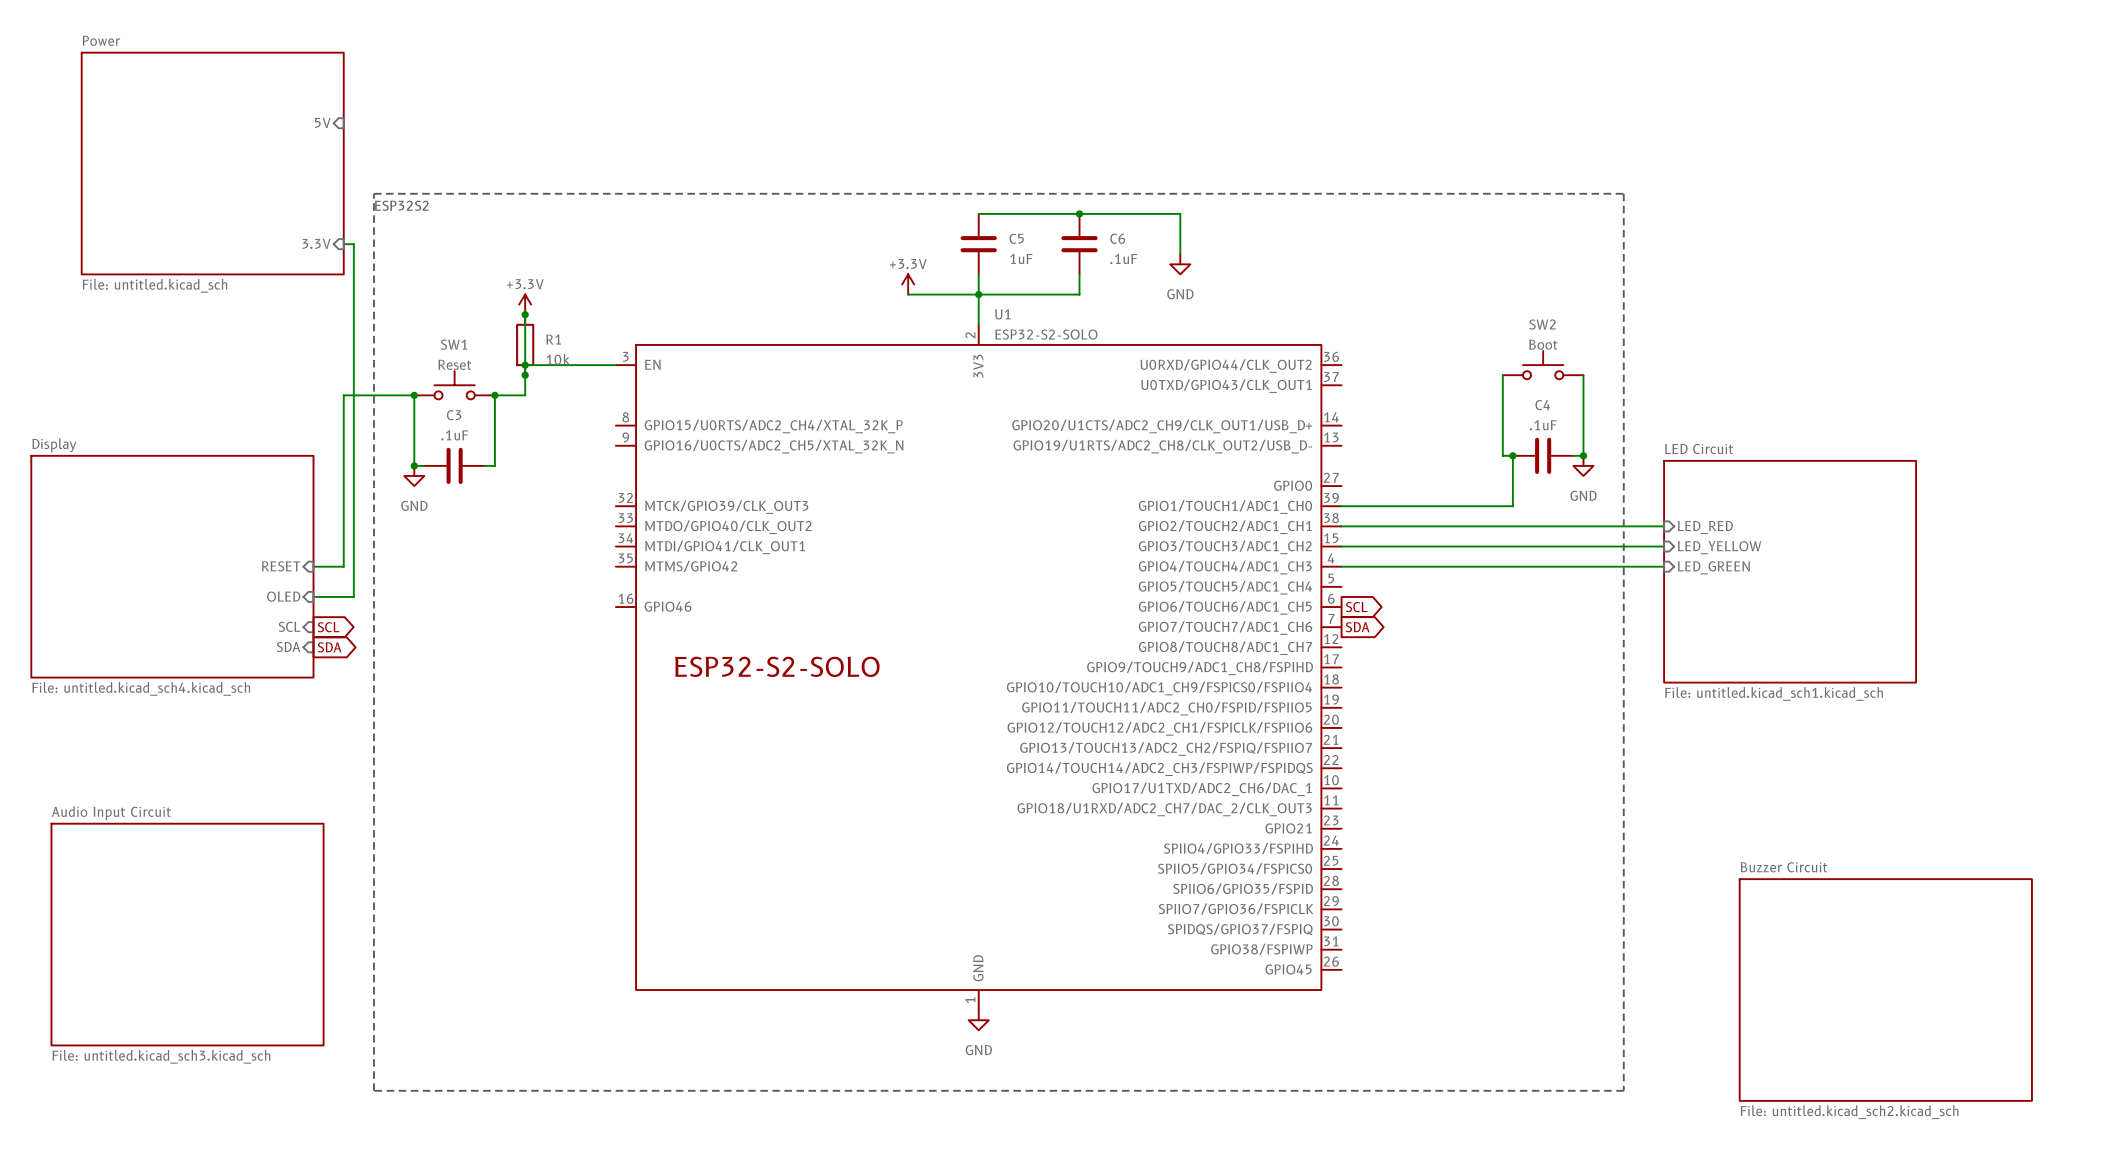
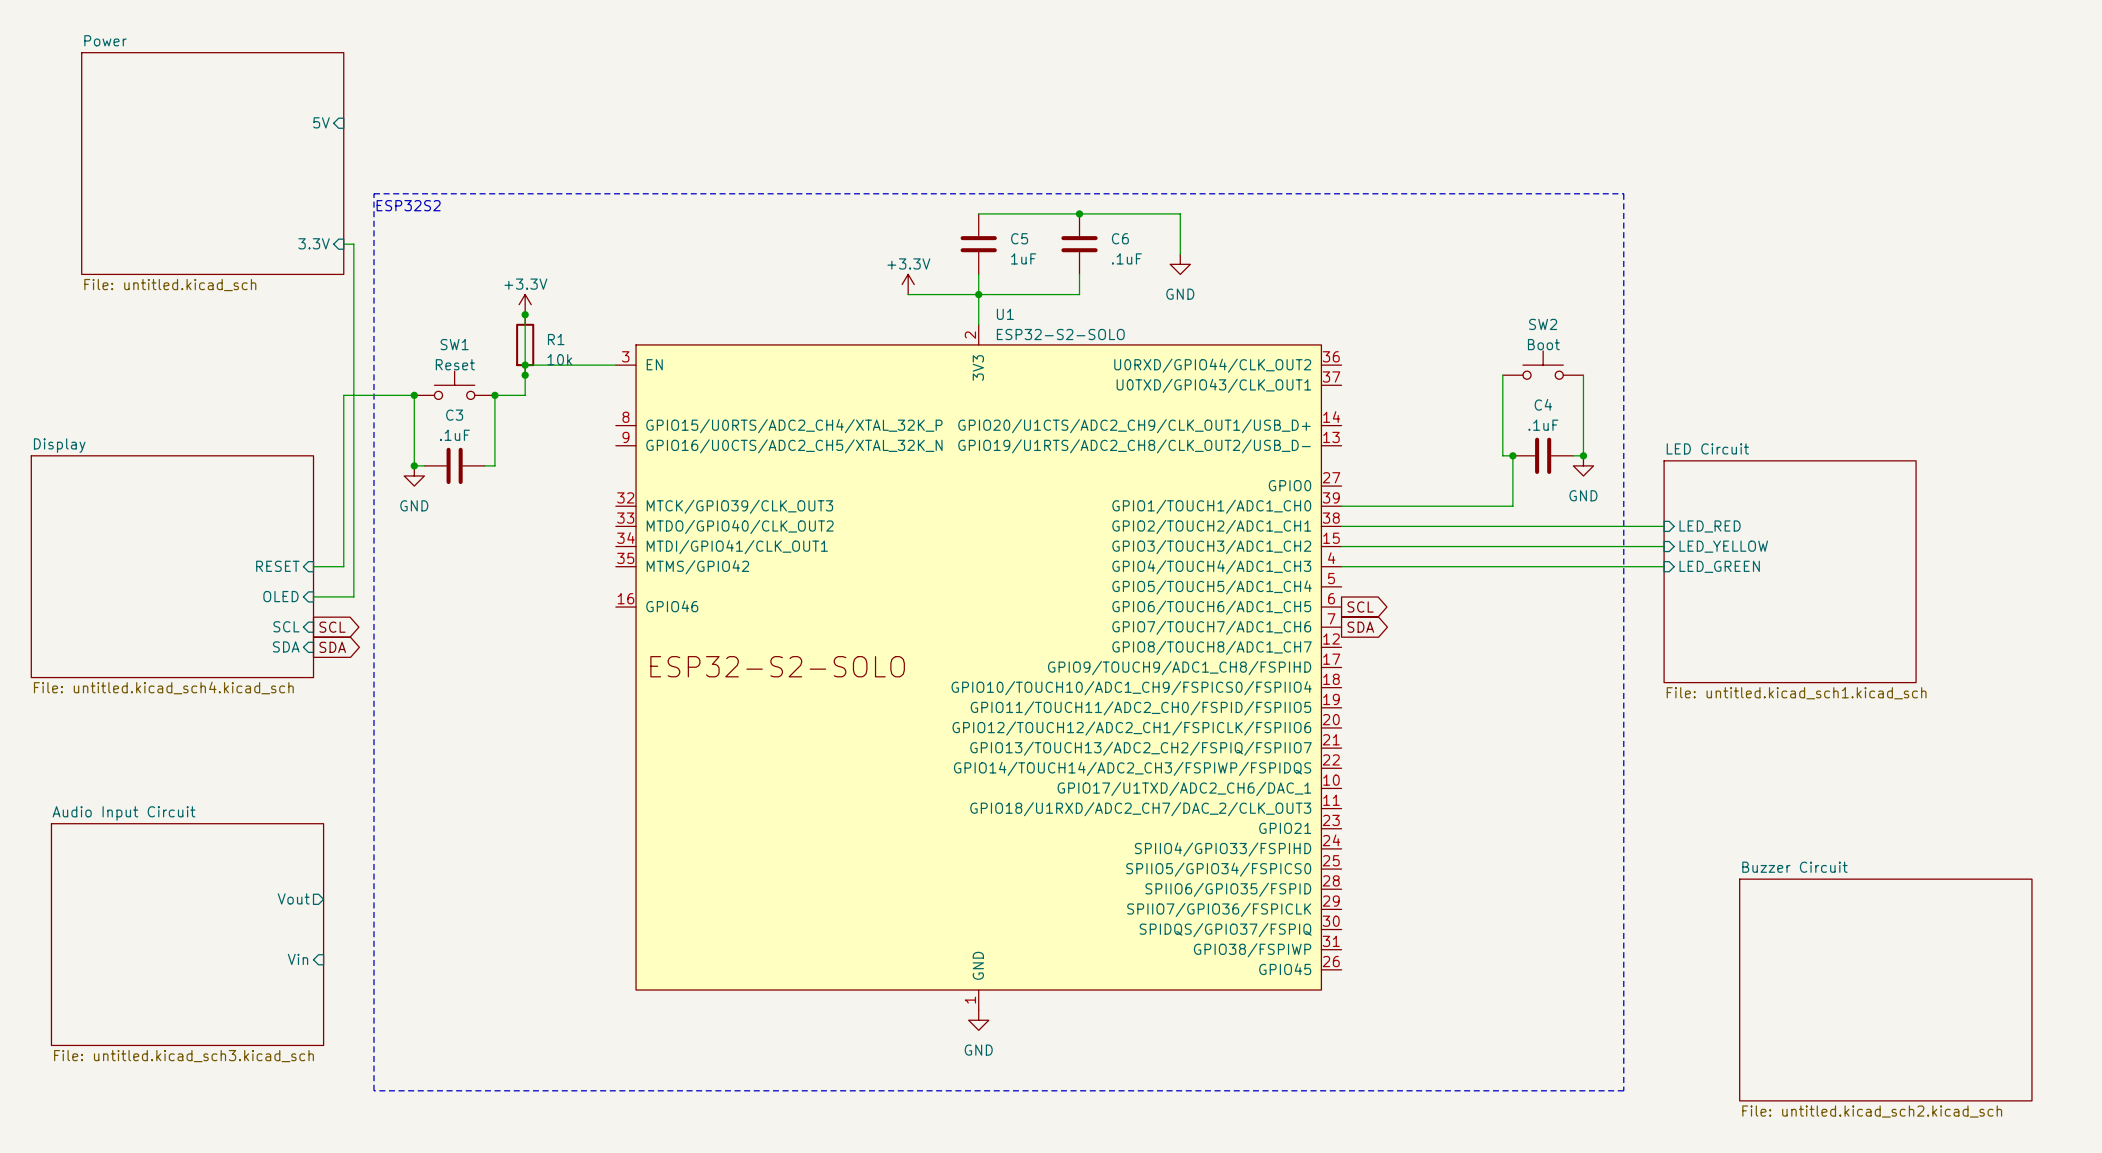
sheet pin: none -> Vout (293, 898)
sheet pin: none -> Vin (298, 959)

